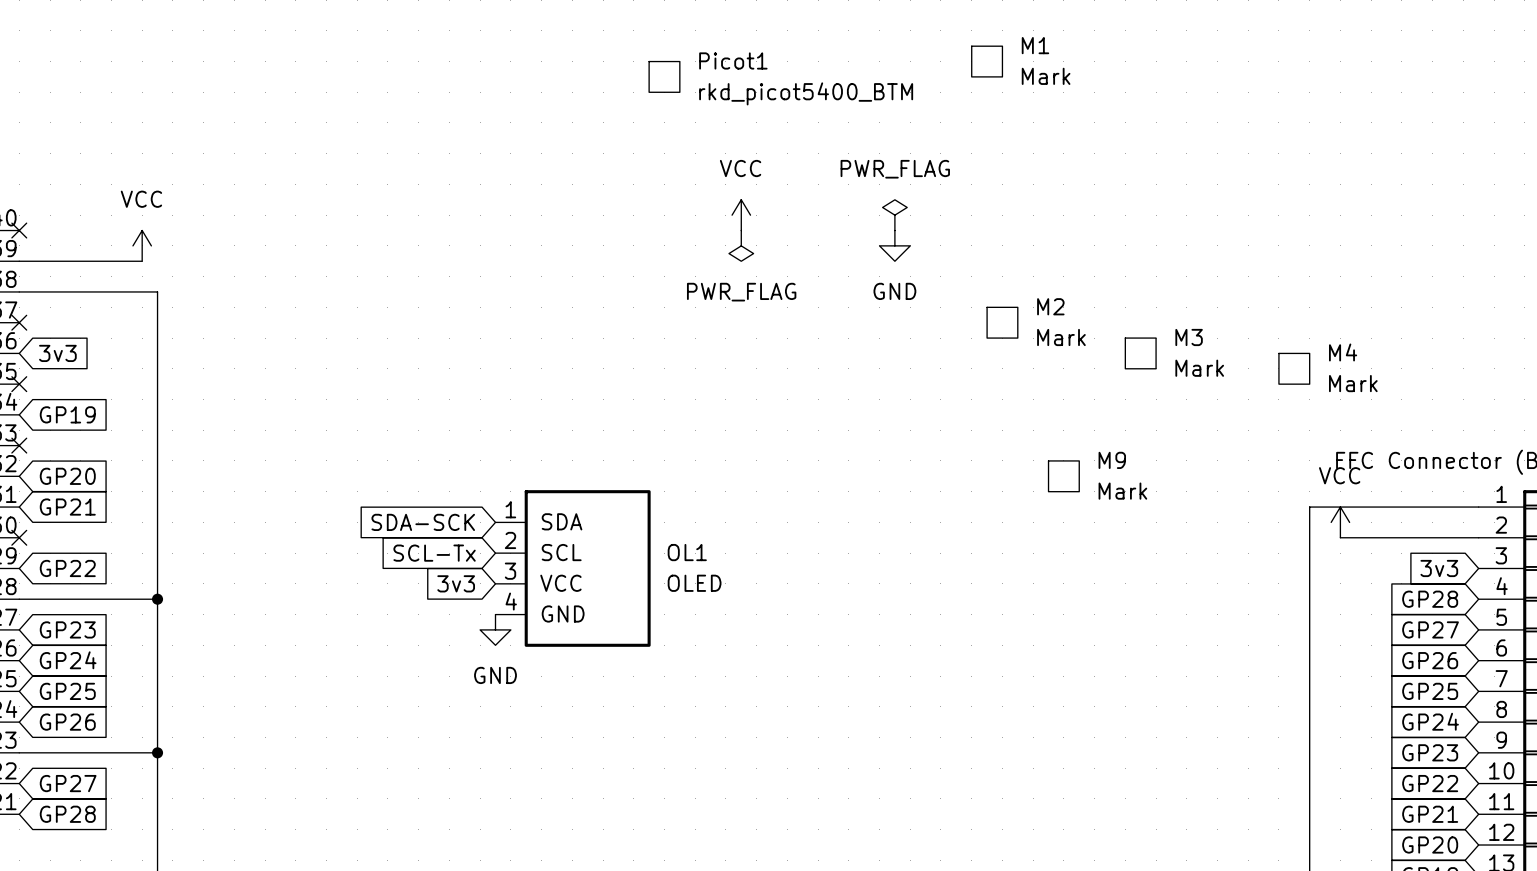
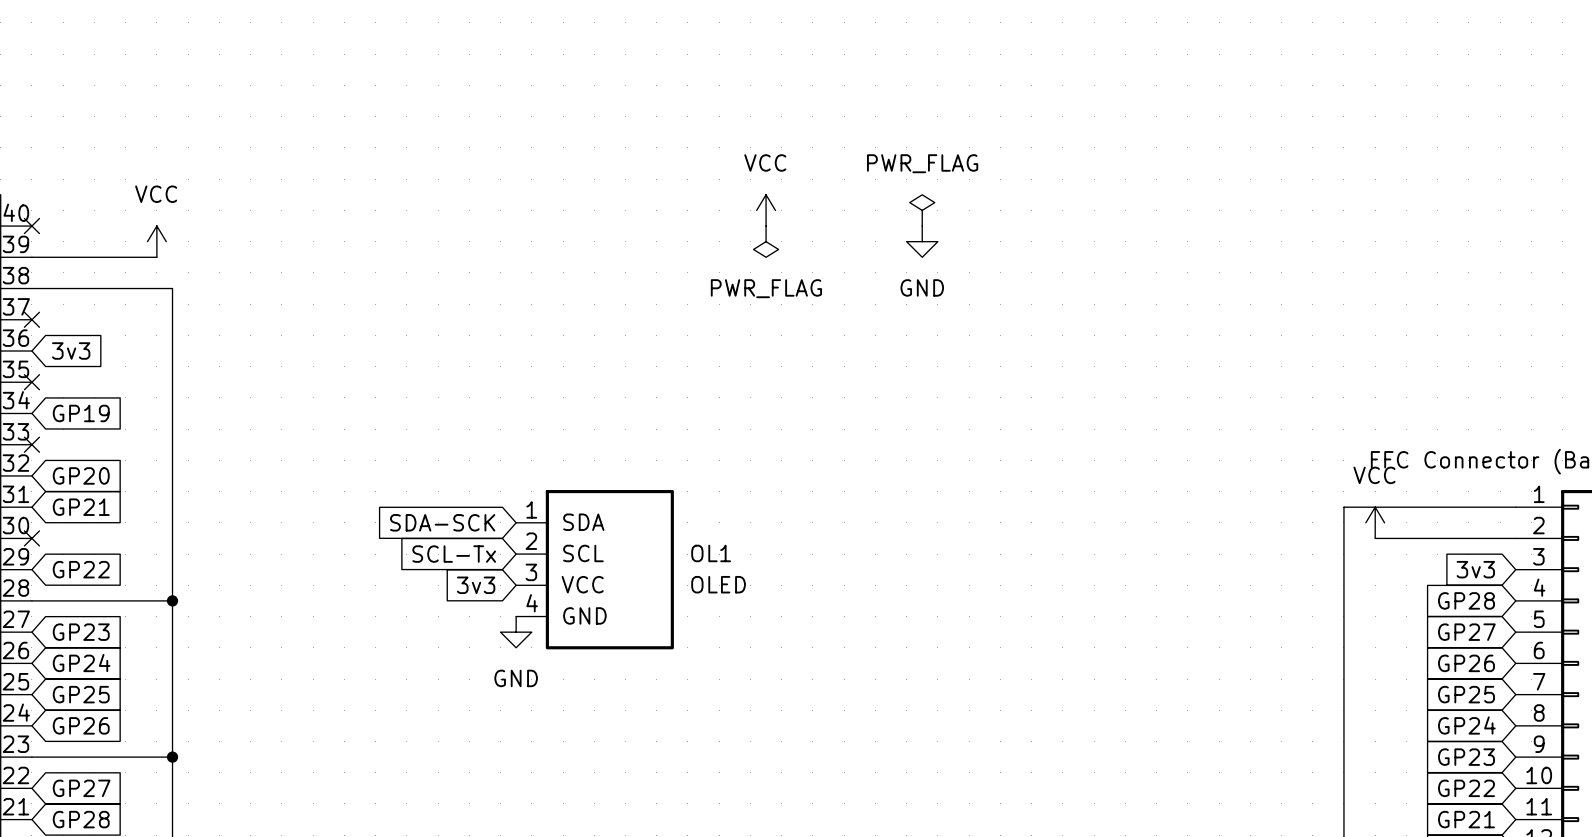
M1: Mark (987, 61) -> none
Picot1: rkd_picot5400_BTM (664, 76) -> none
M2: Mark (1002, 322) -> none
M3: Mark (1140, 353) -> none
M4: Mark (1294, 368) -> none
M9: Mark (1063, 476) -> none

